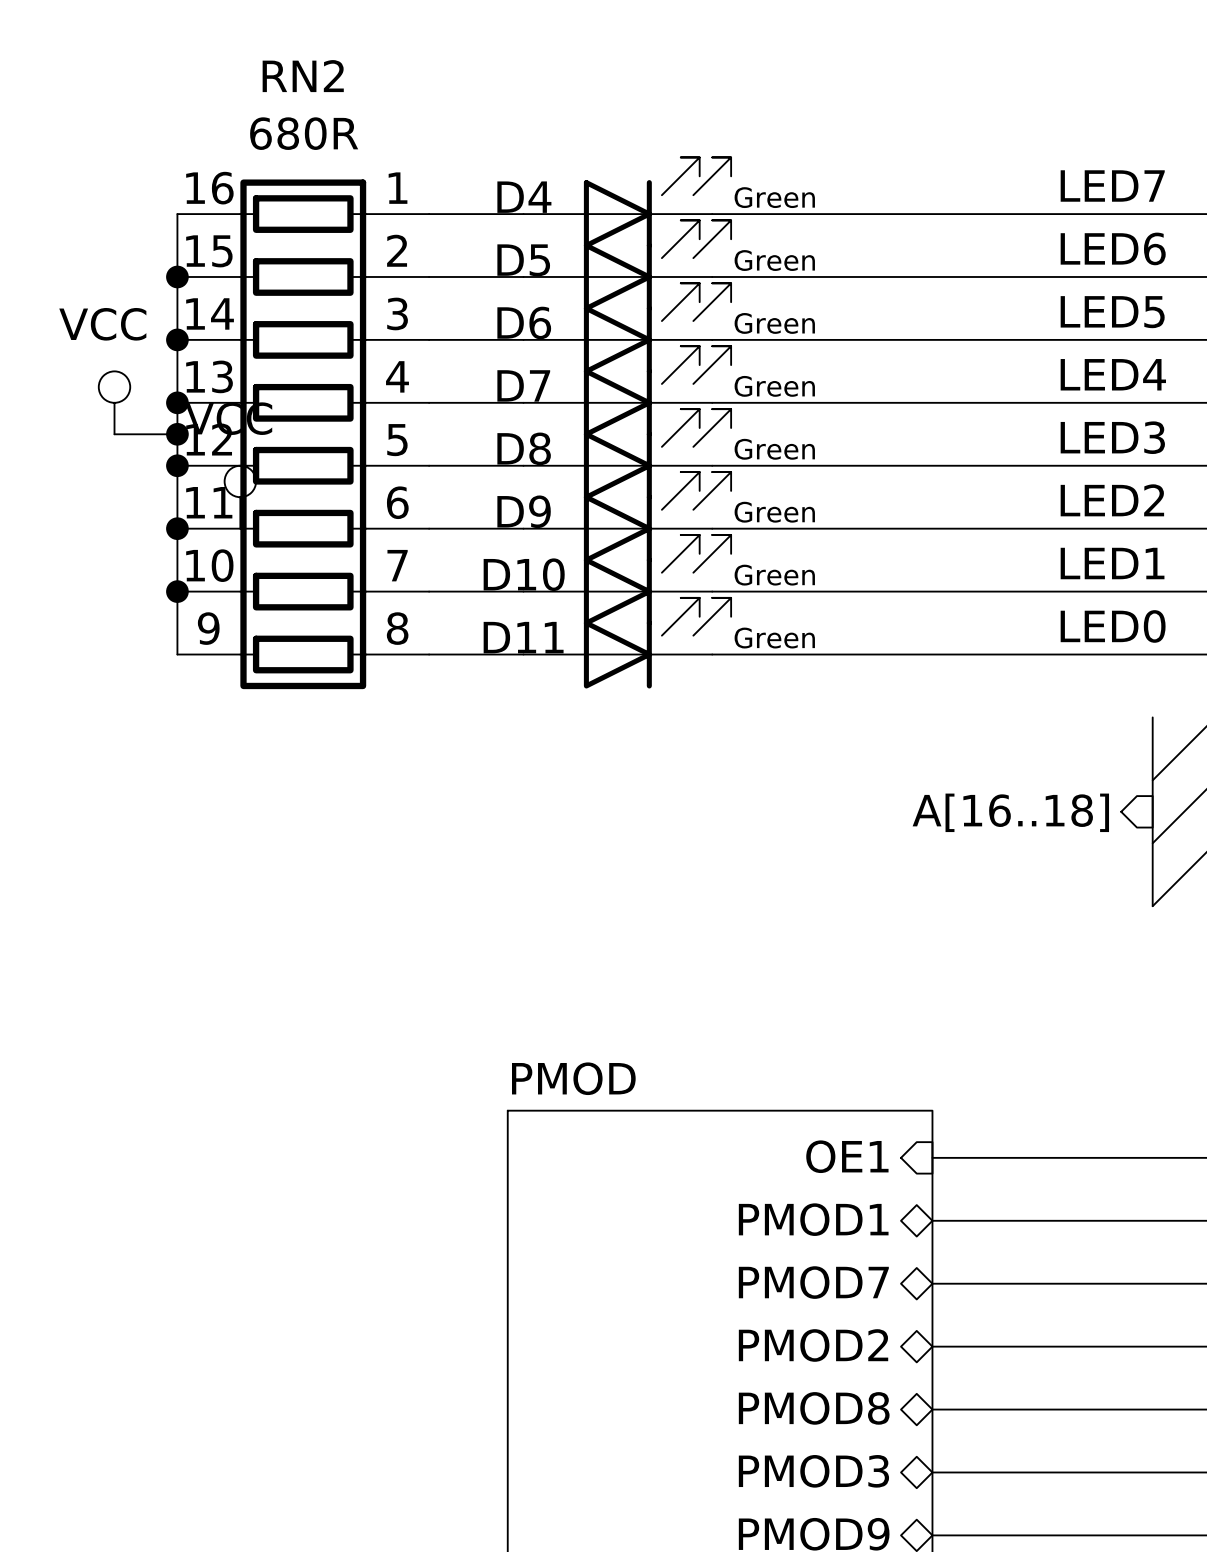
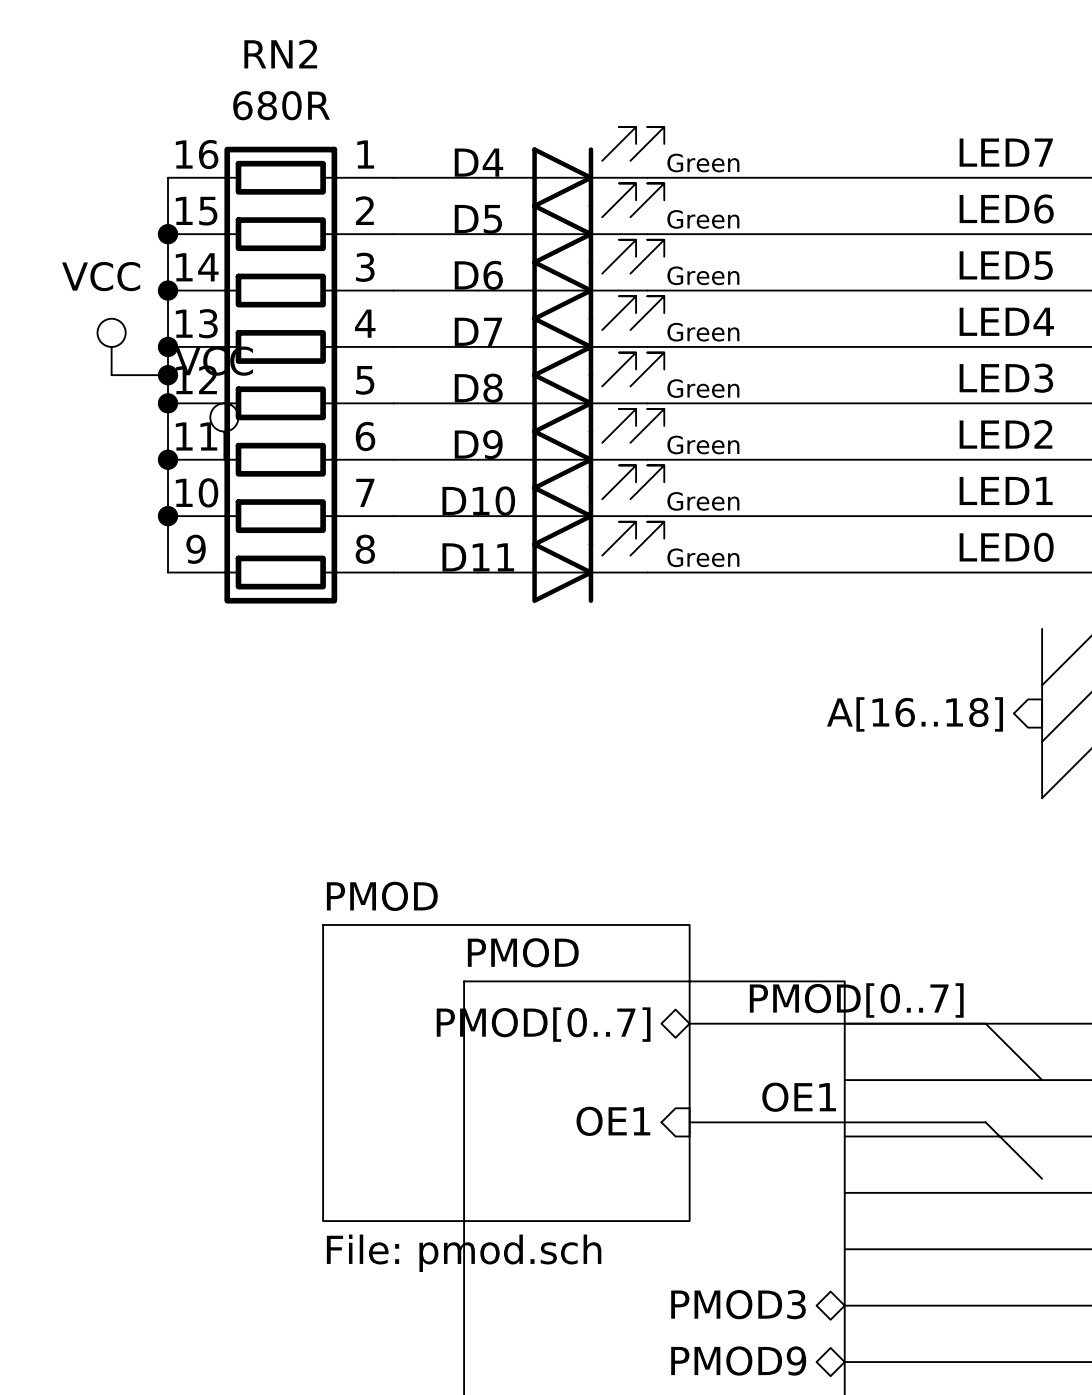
label: none -> PMOD[0..7] (856, 1000)
sheet pin position: OE1 (847, 1156) -> OE1 (613, 1121)
bus: none -> (689, 1023) (985, 1023) (1042, 1080)
sheet pin: none -> PMOD[0..7] (543, 1024)
sheet PMOD: none -> File: pmod.sch (506, 1073)
sheet pin: PMOD1 (813, 1219) -> none
label: none -> OE1 (799, 1097)
wire: none -> (689, 1122) (985, 1122) (1042, 1178)
sheet pin: PMOD7 (813, 1282) -> none
sheet pin: PMOD2 (813, 1345) -> none
sheet pin: PMOD8 (814, 1408) -> none

